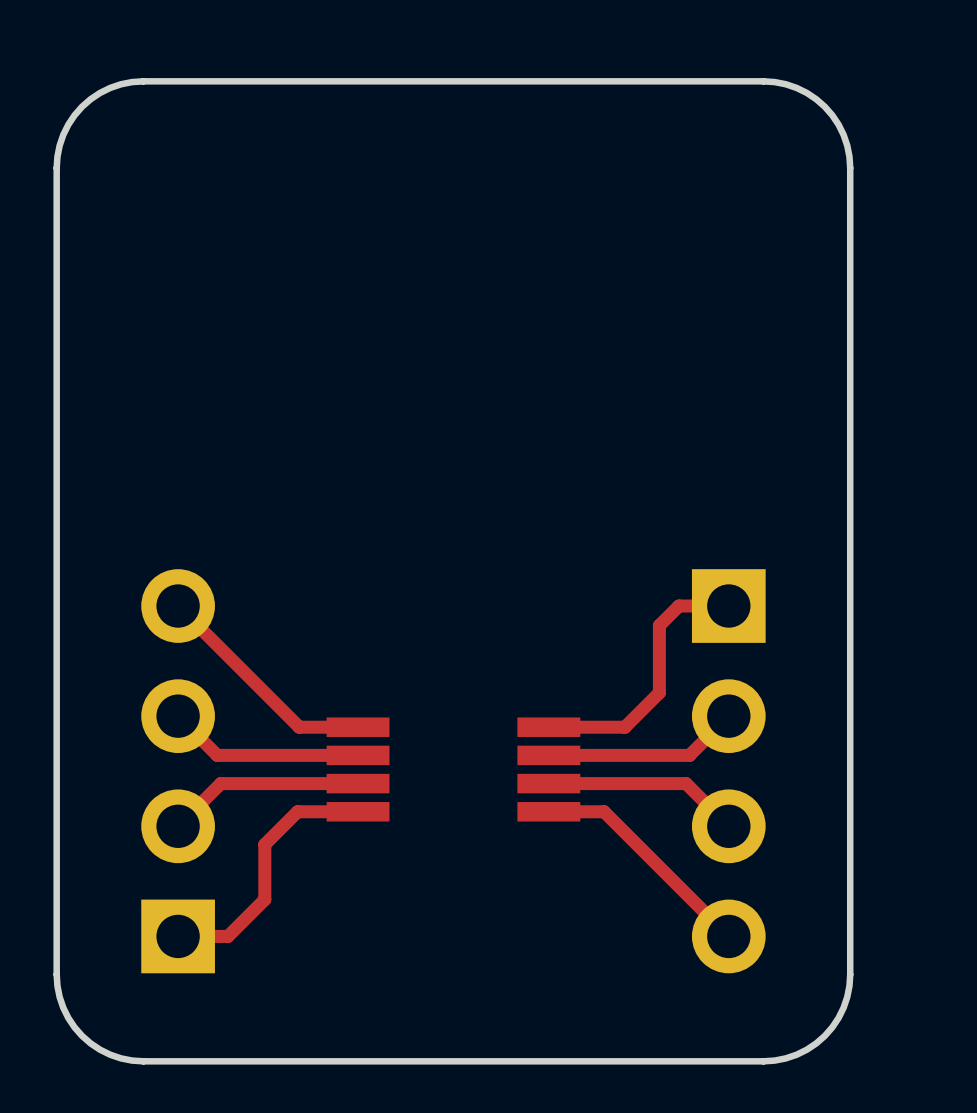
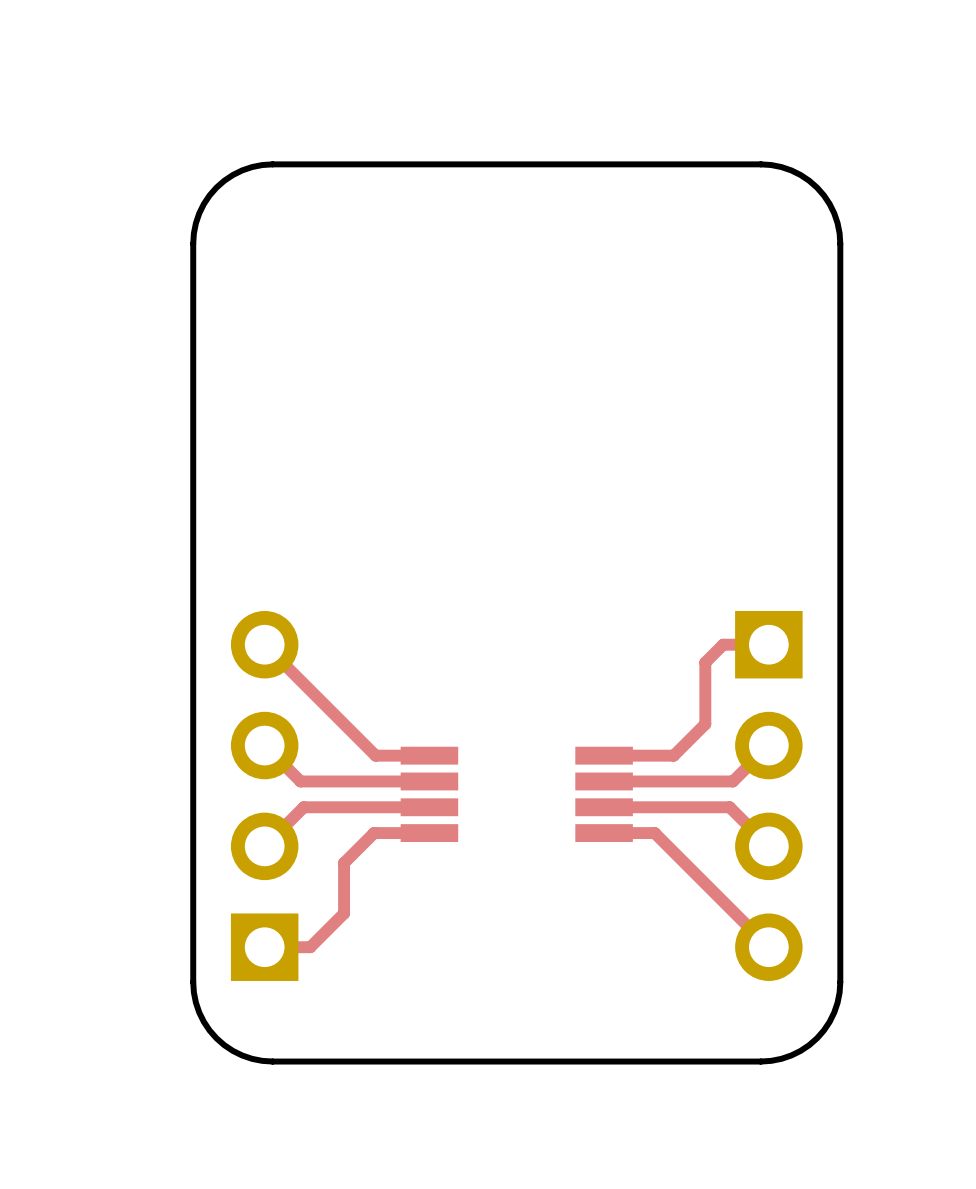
board edge: (186, 81) (132, 82) (100, 92) (82, 106) (68, 124) (59, 145) (56, 168) (57, 985) (68, 1017) (82, 1035) (100, 1049) (132, 1060) (186, 1061) -> (272, 164) (242, 170) (216, 187) (199, 213) (193, 243) (193, 992) (203, 1021) (224, 1045) (242, 1055) (272, 1061)
board edge: (720, 81) (774, 82) (806, 92) (824, 106) (838, 124) (847, 145) (850, 168) (849, 985) (843, 1007) (832, 1027) (806, 1049) (774, 1060) (720, 1061) -> (760, 164) (791, 170) (817, 187) (834, 213) (840, 243) (839, 992) (834, 1012) (817, 1038) (791, 1055) (760, 1061)

